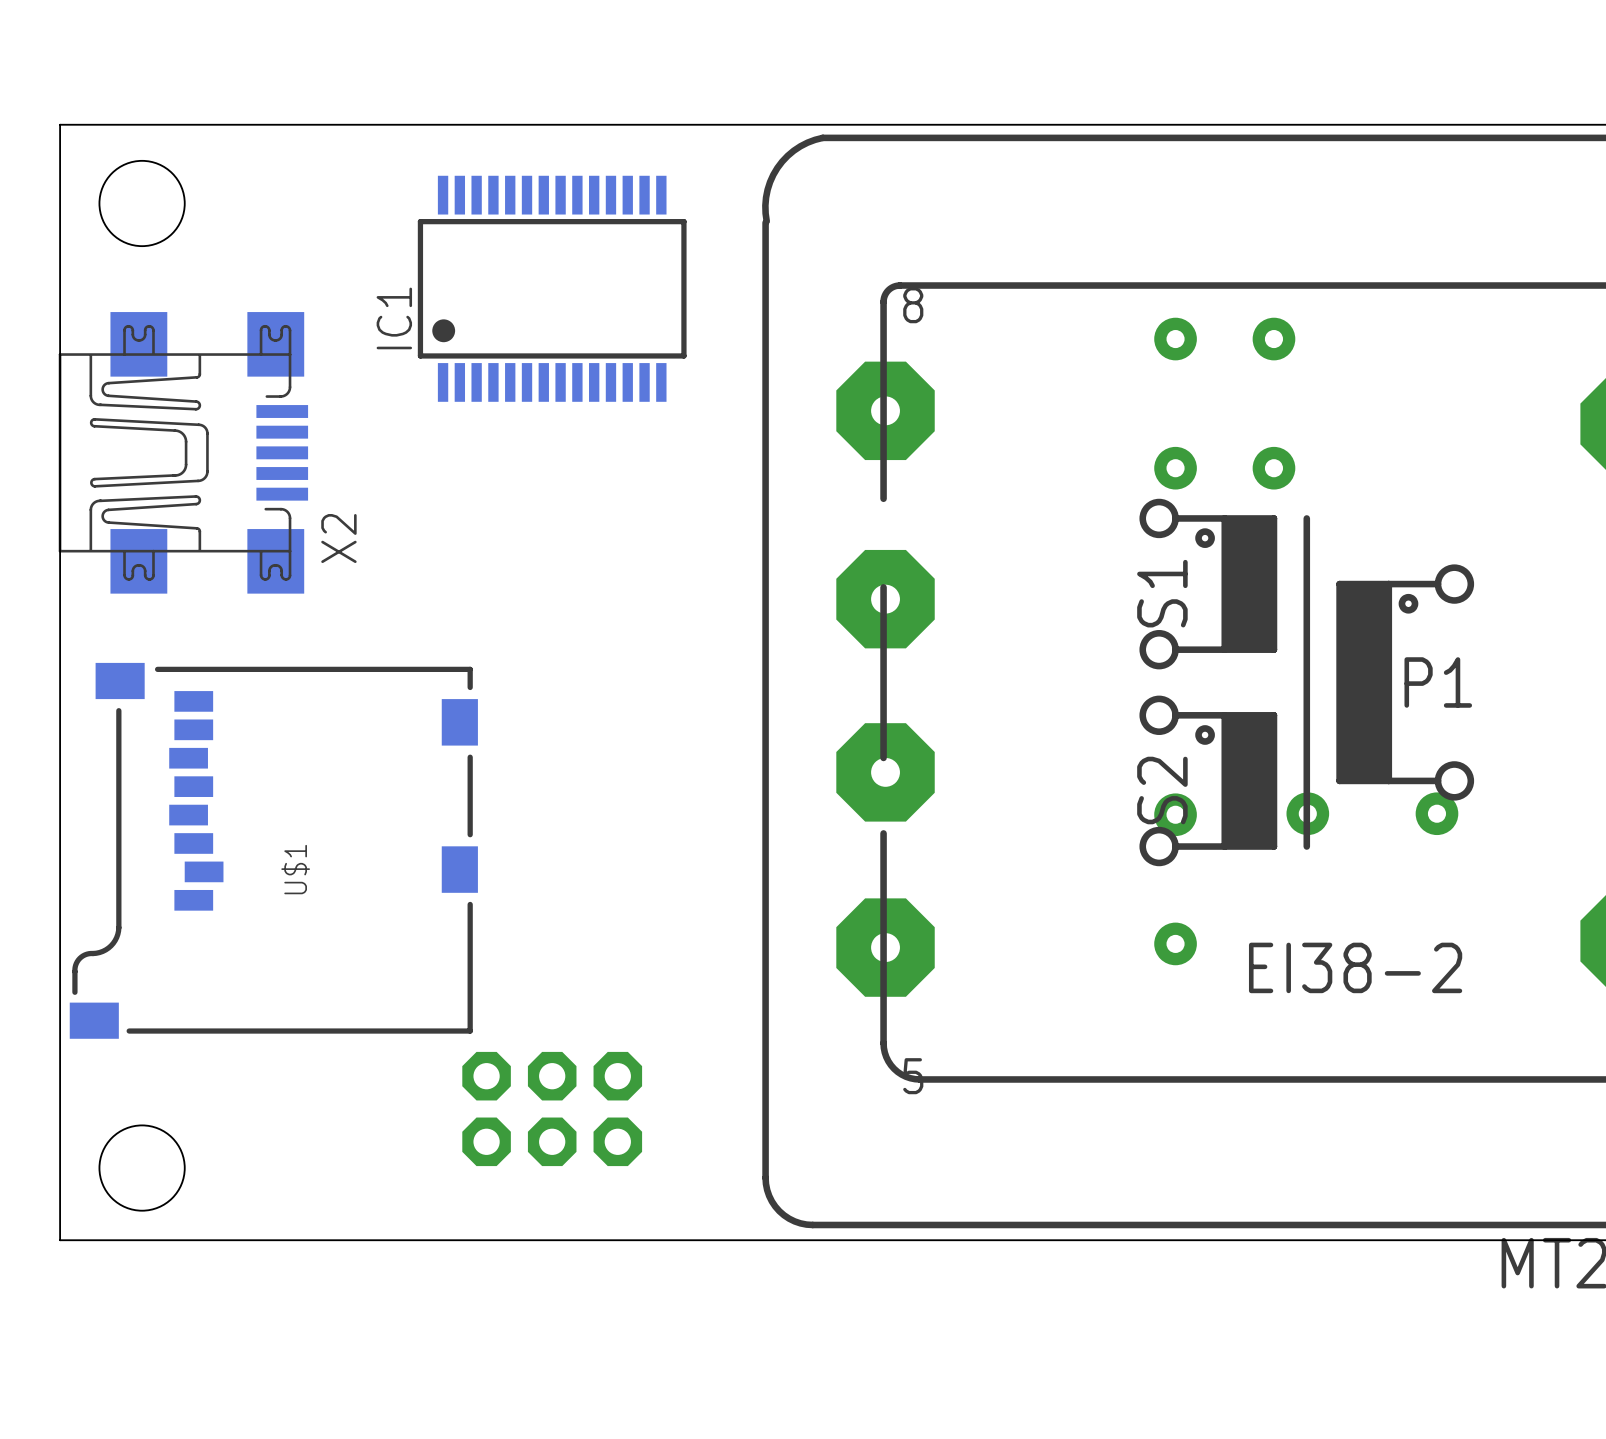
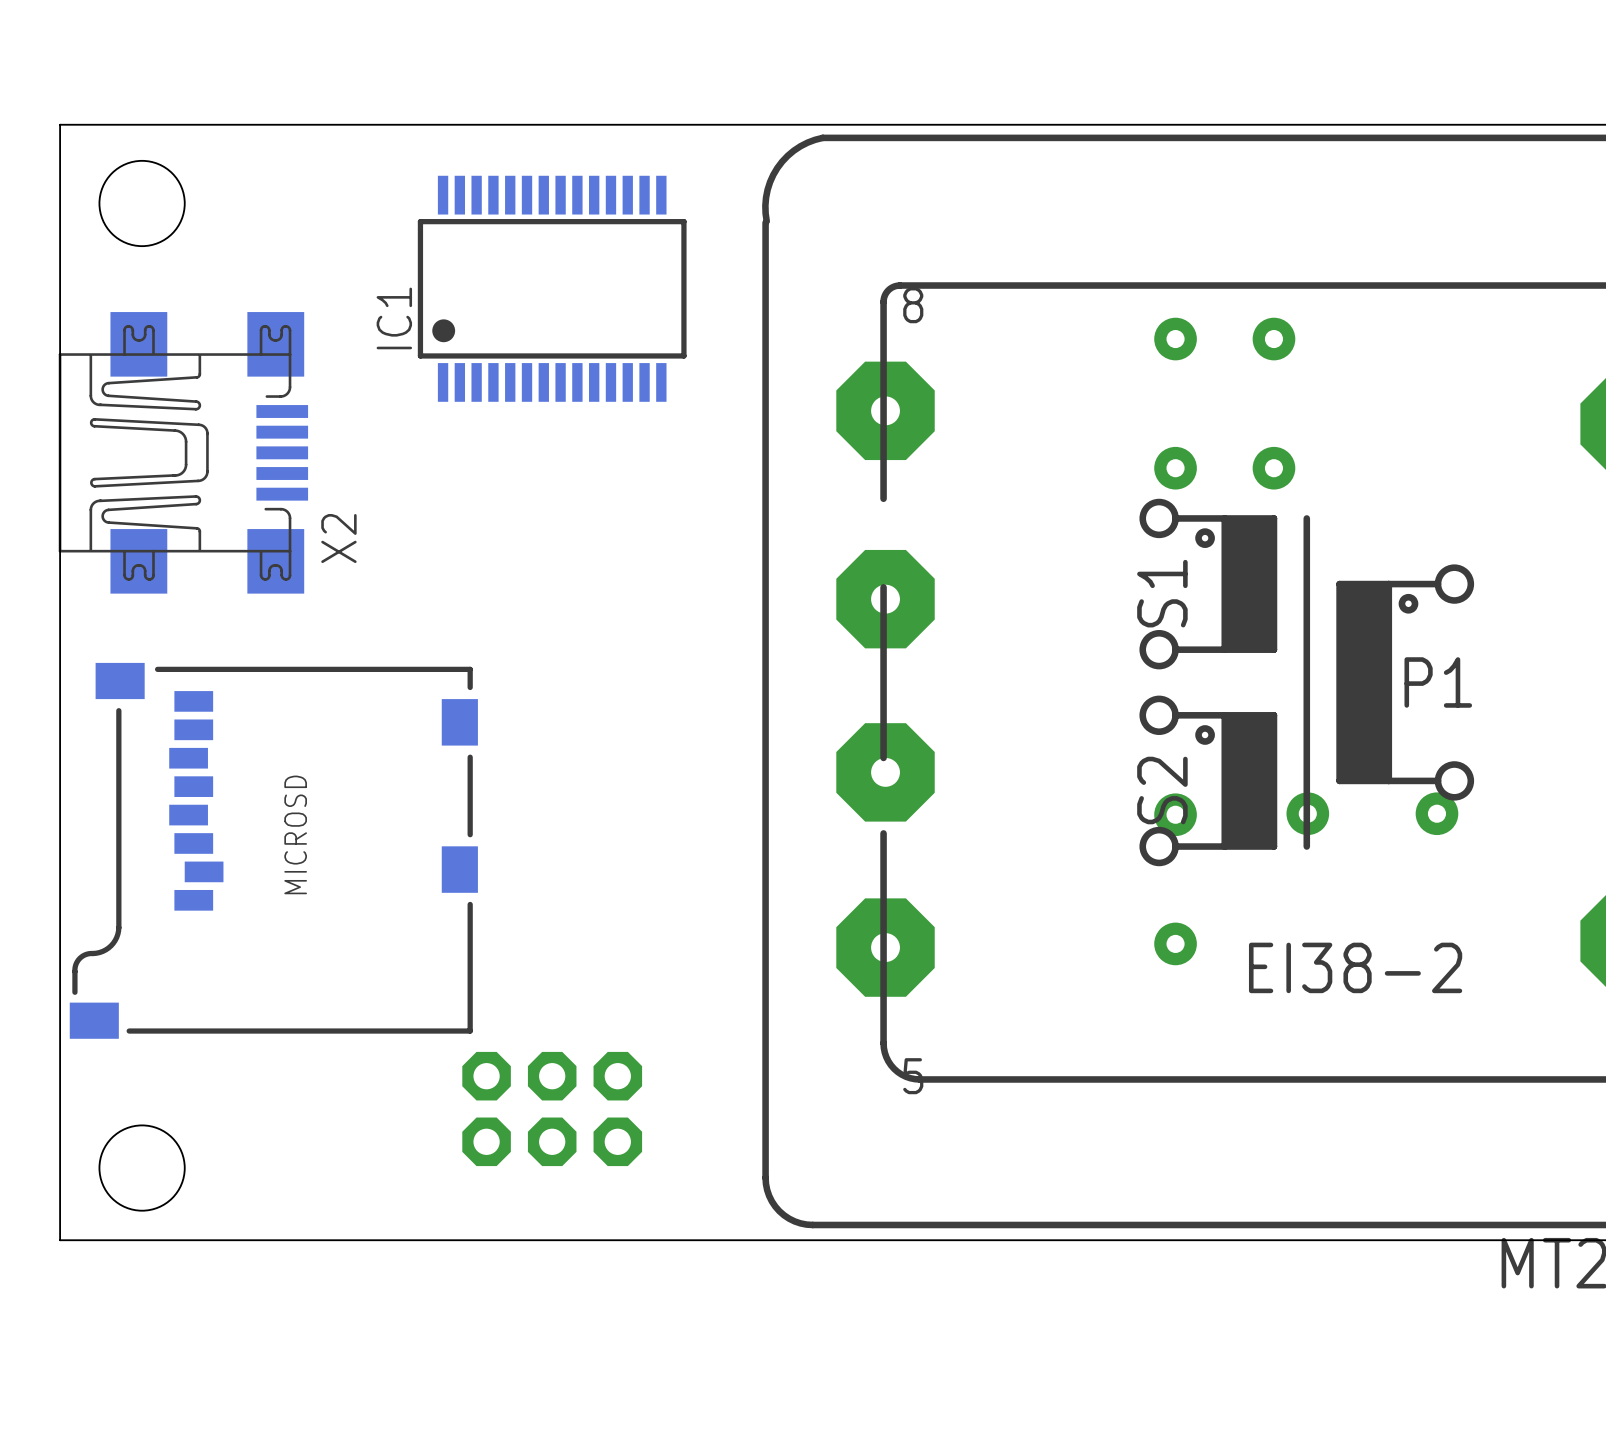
U$1 name: U$1 (295, 869) -> MICROSD (295, 834)

